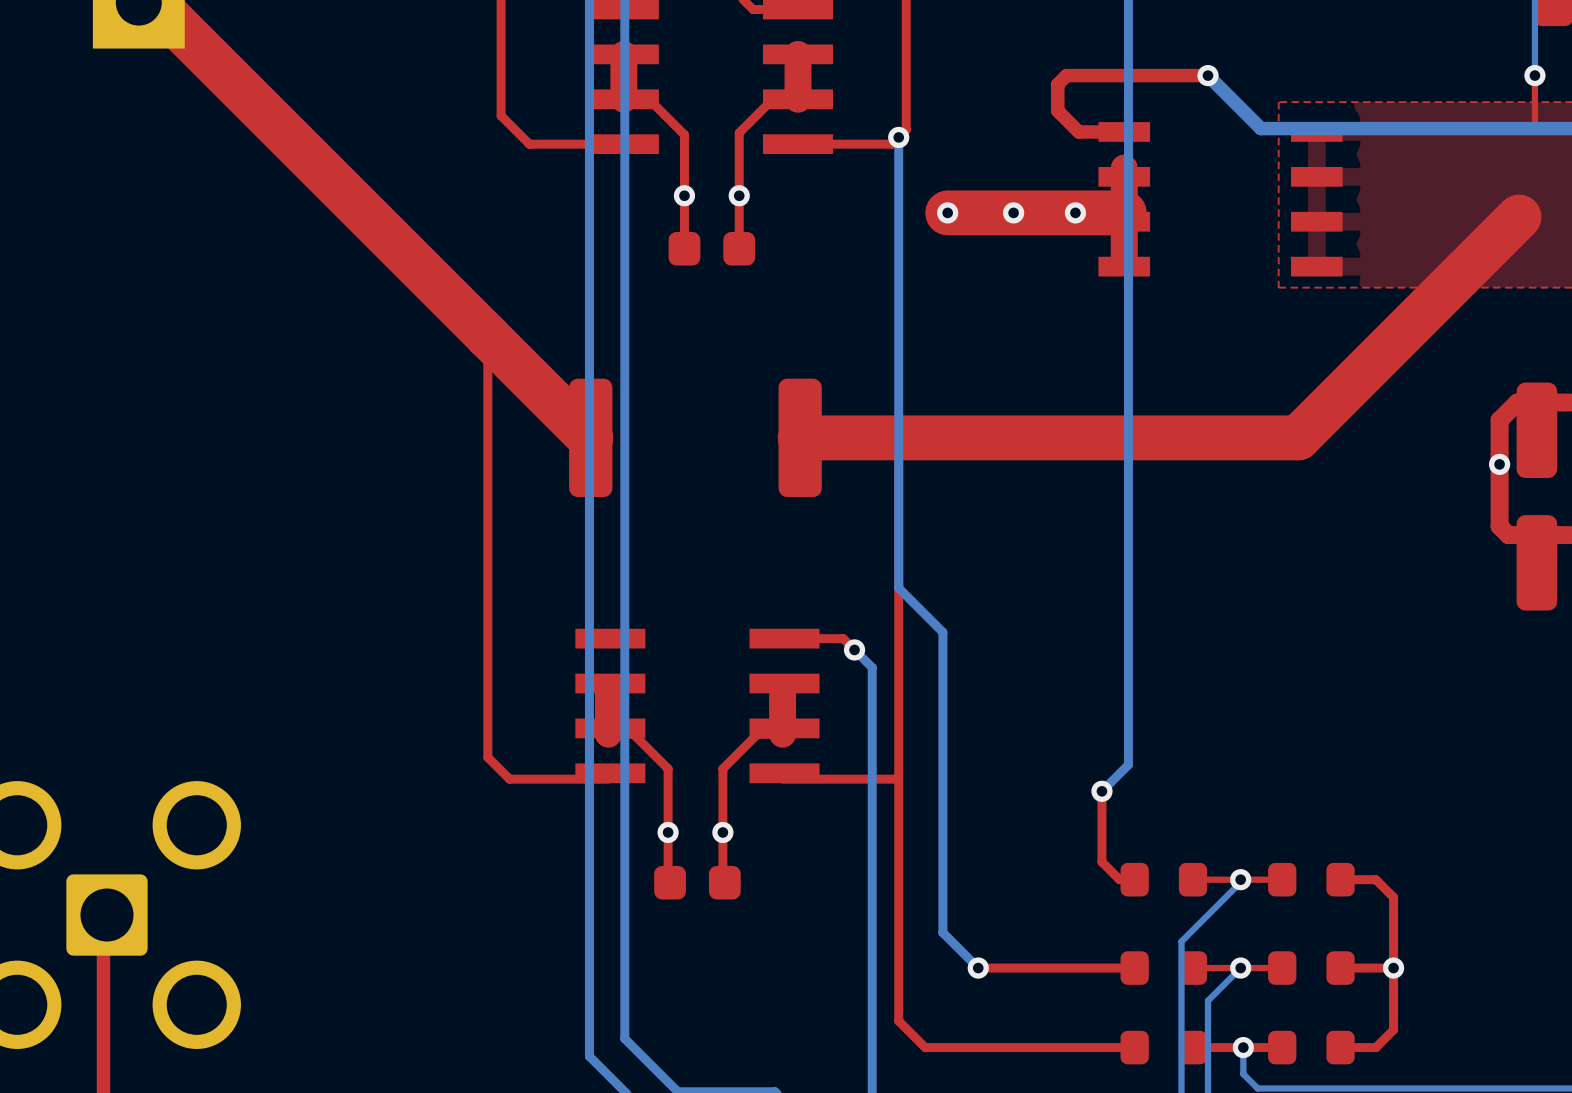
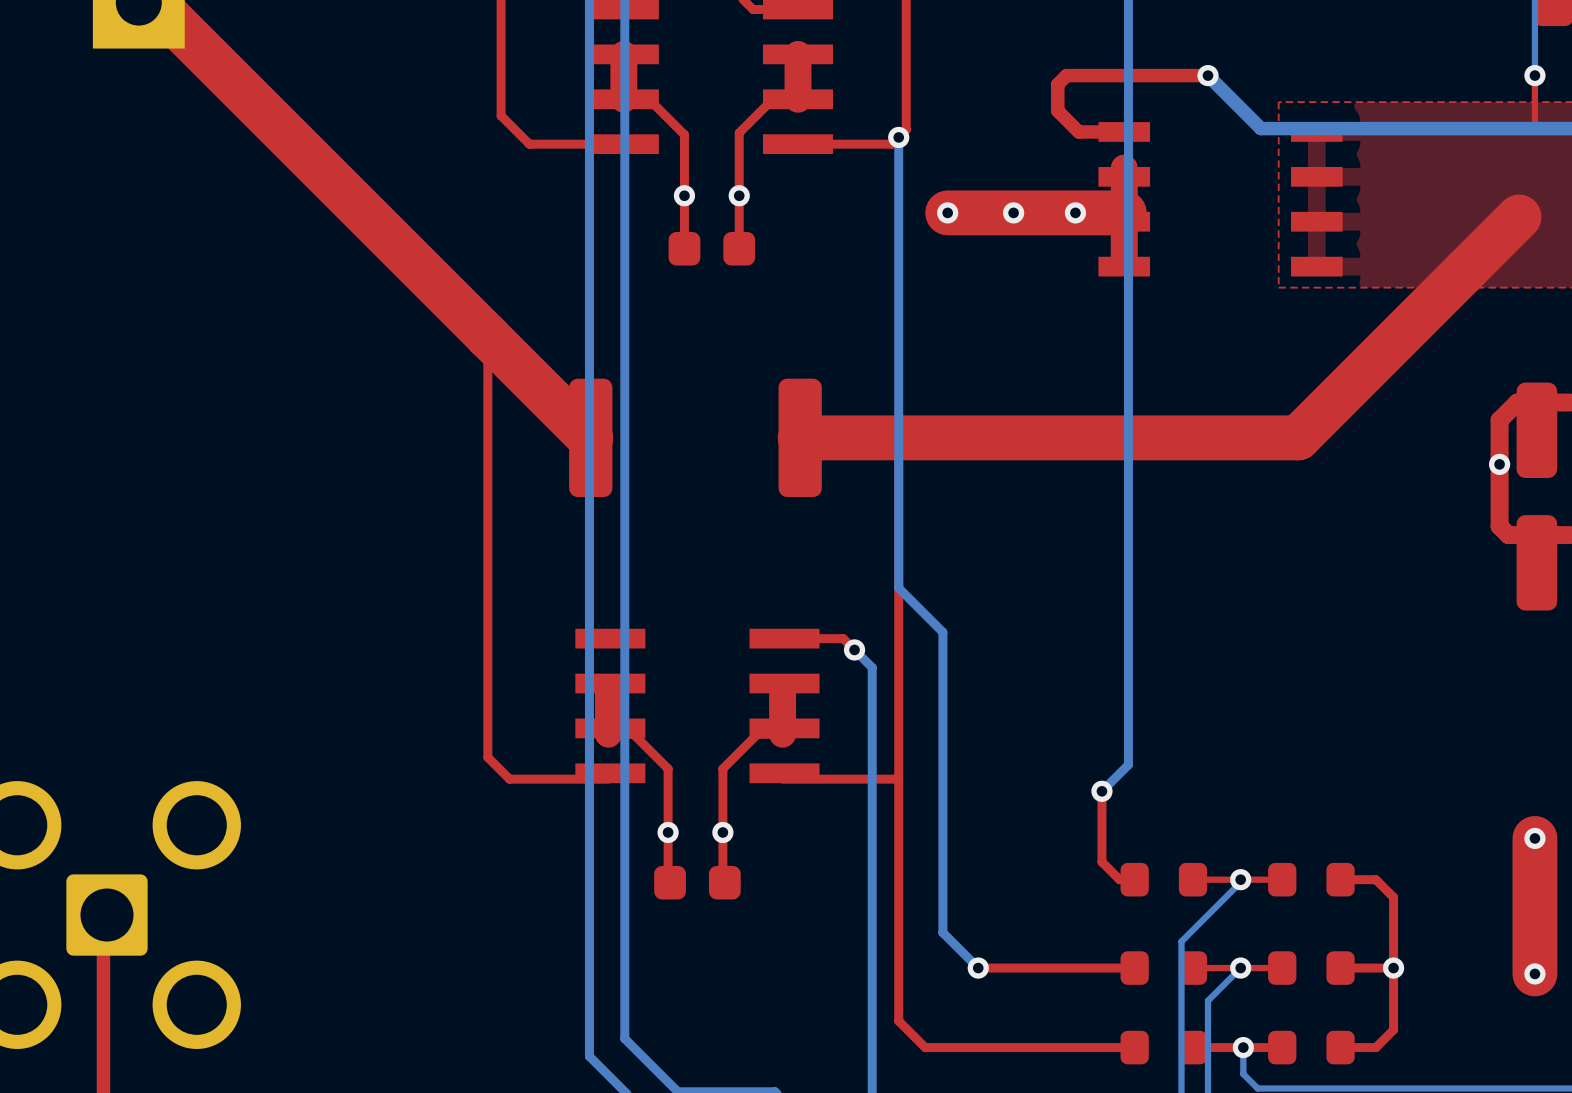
top track: none -> (1534, 838) (1534, 973)
via: none -> (1534, 838)
via: none -> (1534, 973)

